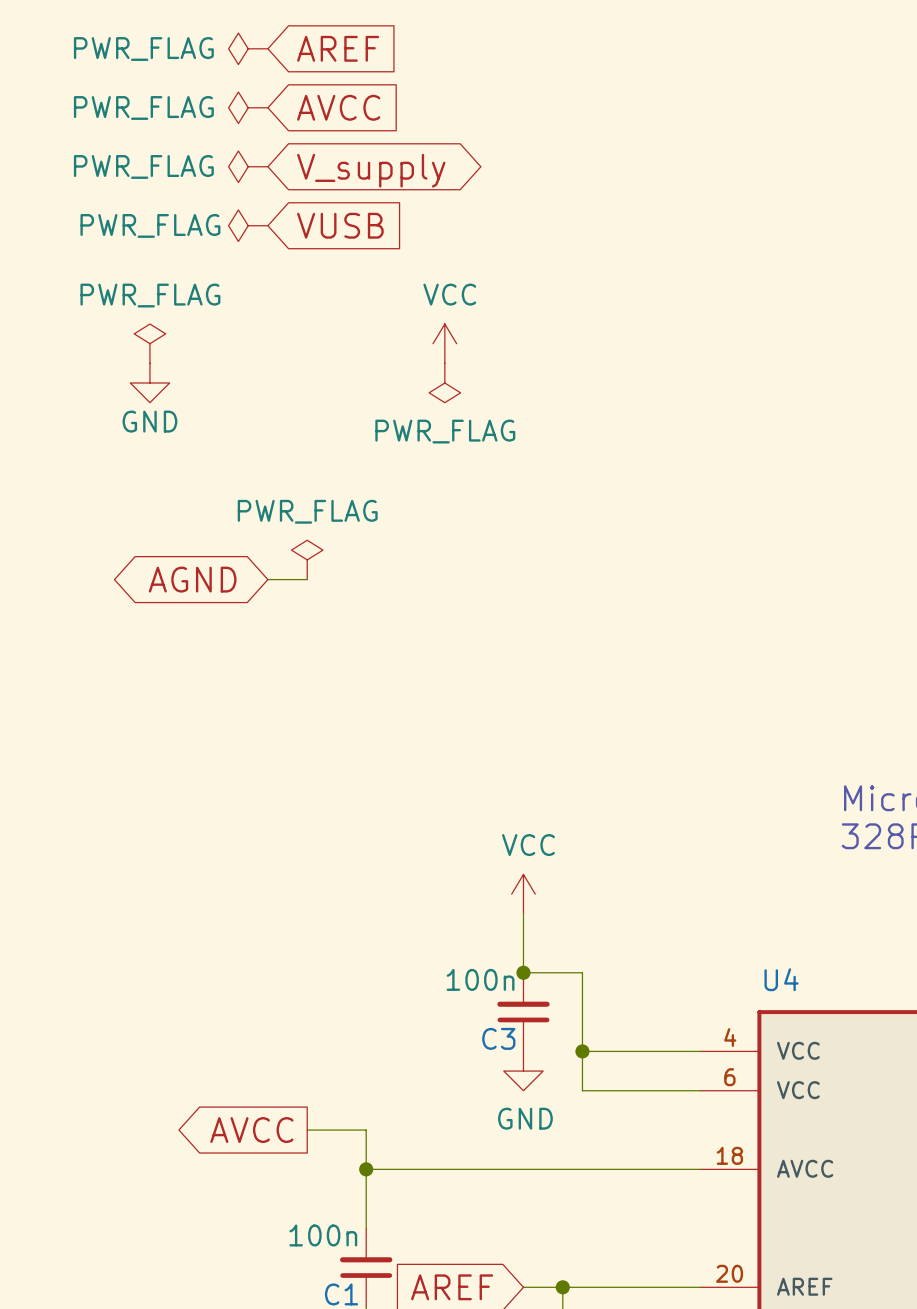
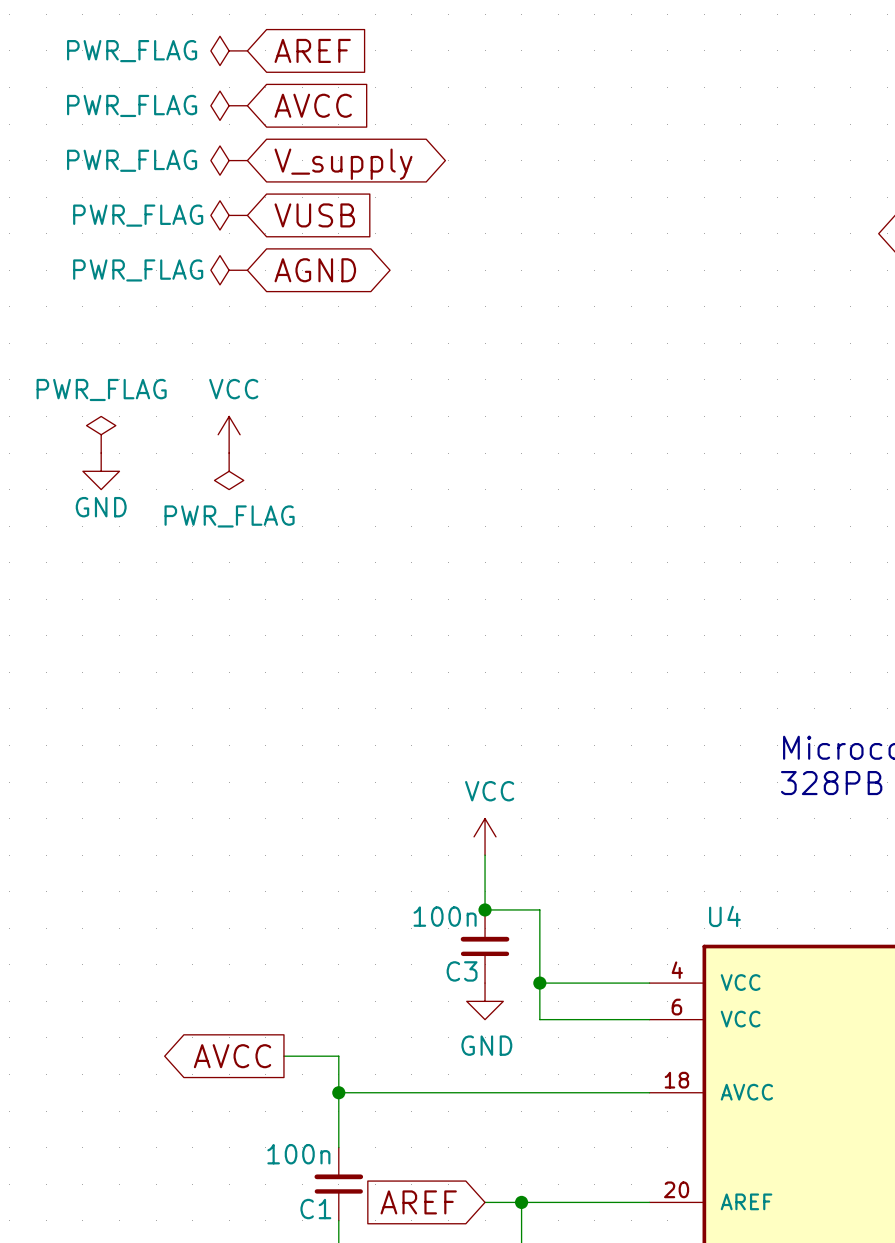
power symbol: none -> PWR_FLAG (229, 270)
power symbol: PWR_FLAG (149, 343) -> none
power symbol position: VCC (444, 343) -> VCC (229, 434)
power symbol position: GND (149, 383) -> GND (101, 471)
power symbol: PWR_FLAG (444, 383) -> none
power symbol: none -> PWR_FLAG (101, 434)
power symbol rotation: 0° (307, 559) -> 180° (229, 471)
power symbol position: PWR_FLAG (307, 559) -> PWR_FLAG (229, 471)
global label rotation: 0° (192, 579) -> 180° (315, 270)
global label position: AGND (192, 579) -> AGND (315, 270)
wire: (267, 579) (307, 579) -> none

